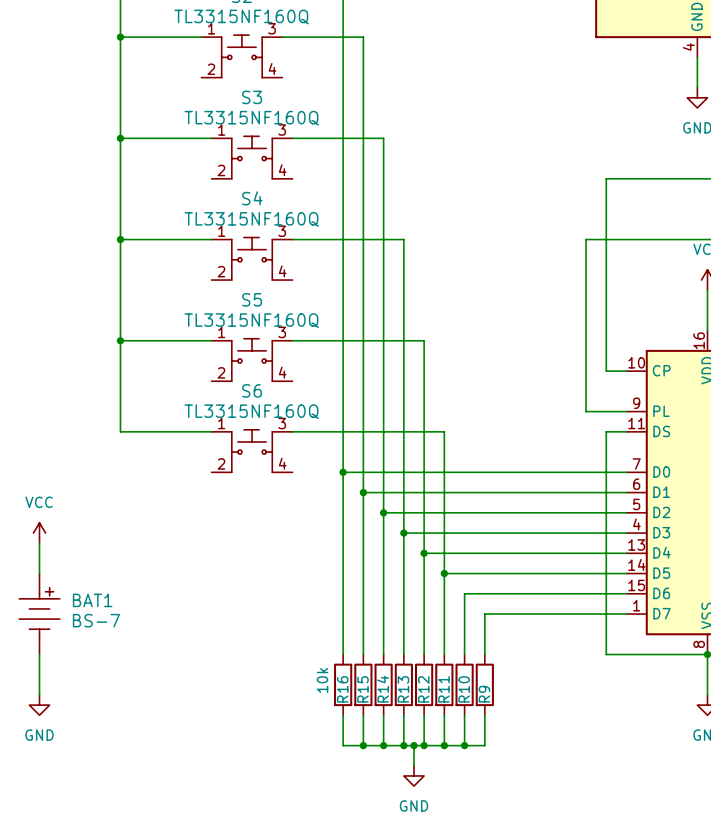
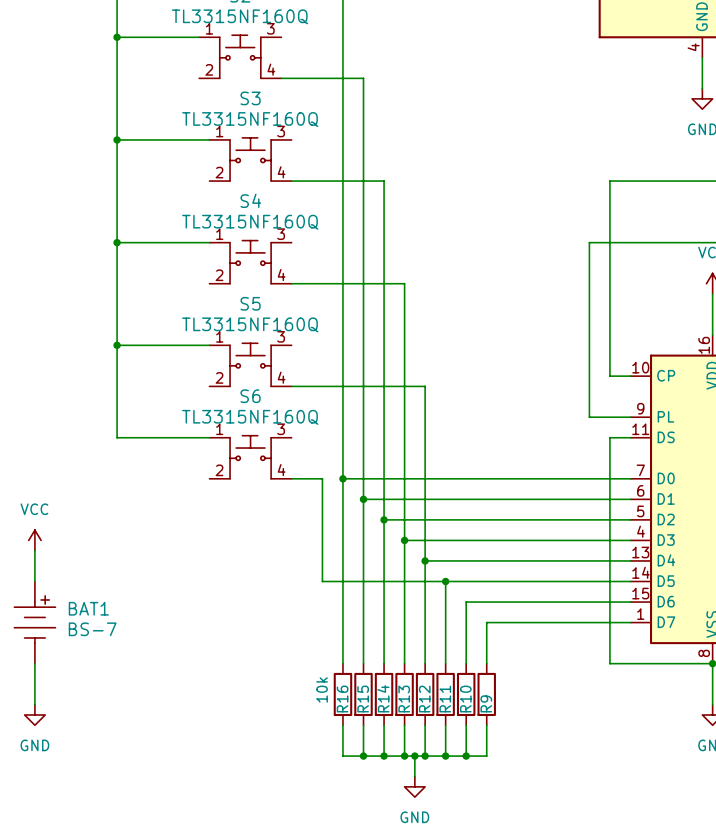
wire: (282, 37) (363, 37) (363, 77) -> (281, 78) (363, 78)
wire: (292, 138) (383, 138) (383, 178) -> (291, 181) (384, 181)
wire: (292, 239) (403, 239) (403, 280) -> (291, 283) (404, 283)
wire: (292, 340) (424, 340) (424, 381) -> (291, 386) (425, 386)
wire: (292, 431) (444, 431) (444, 573) -> (291, 478) (322, 478) (322, 581) (445, 581)

